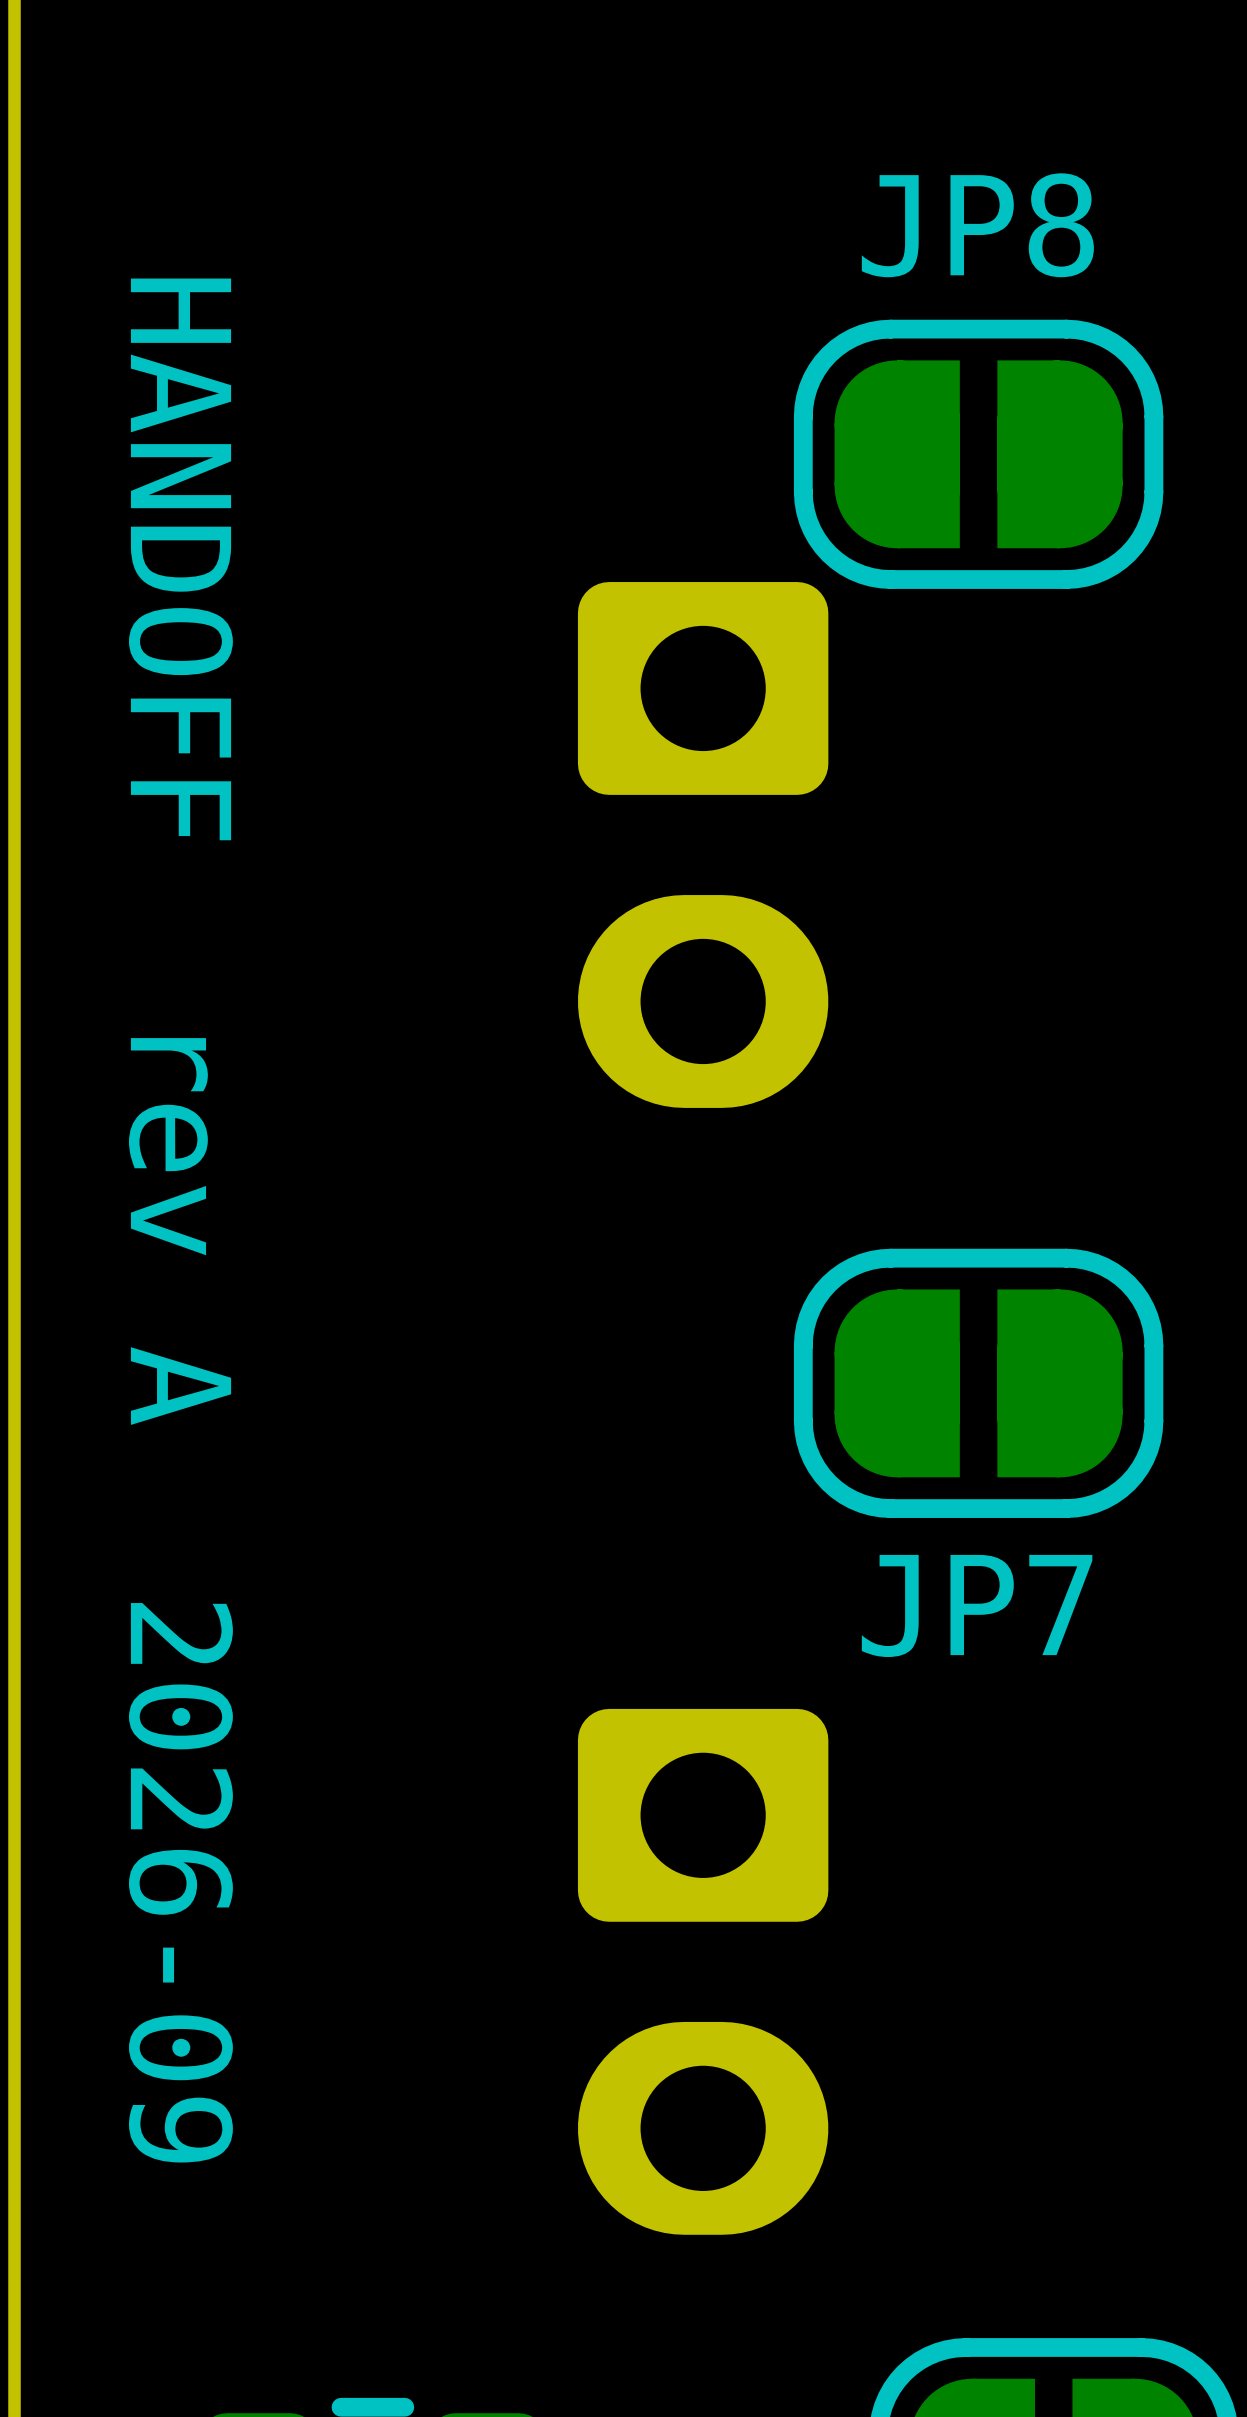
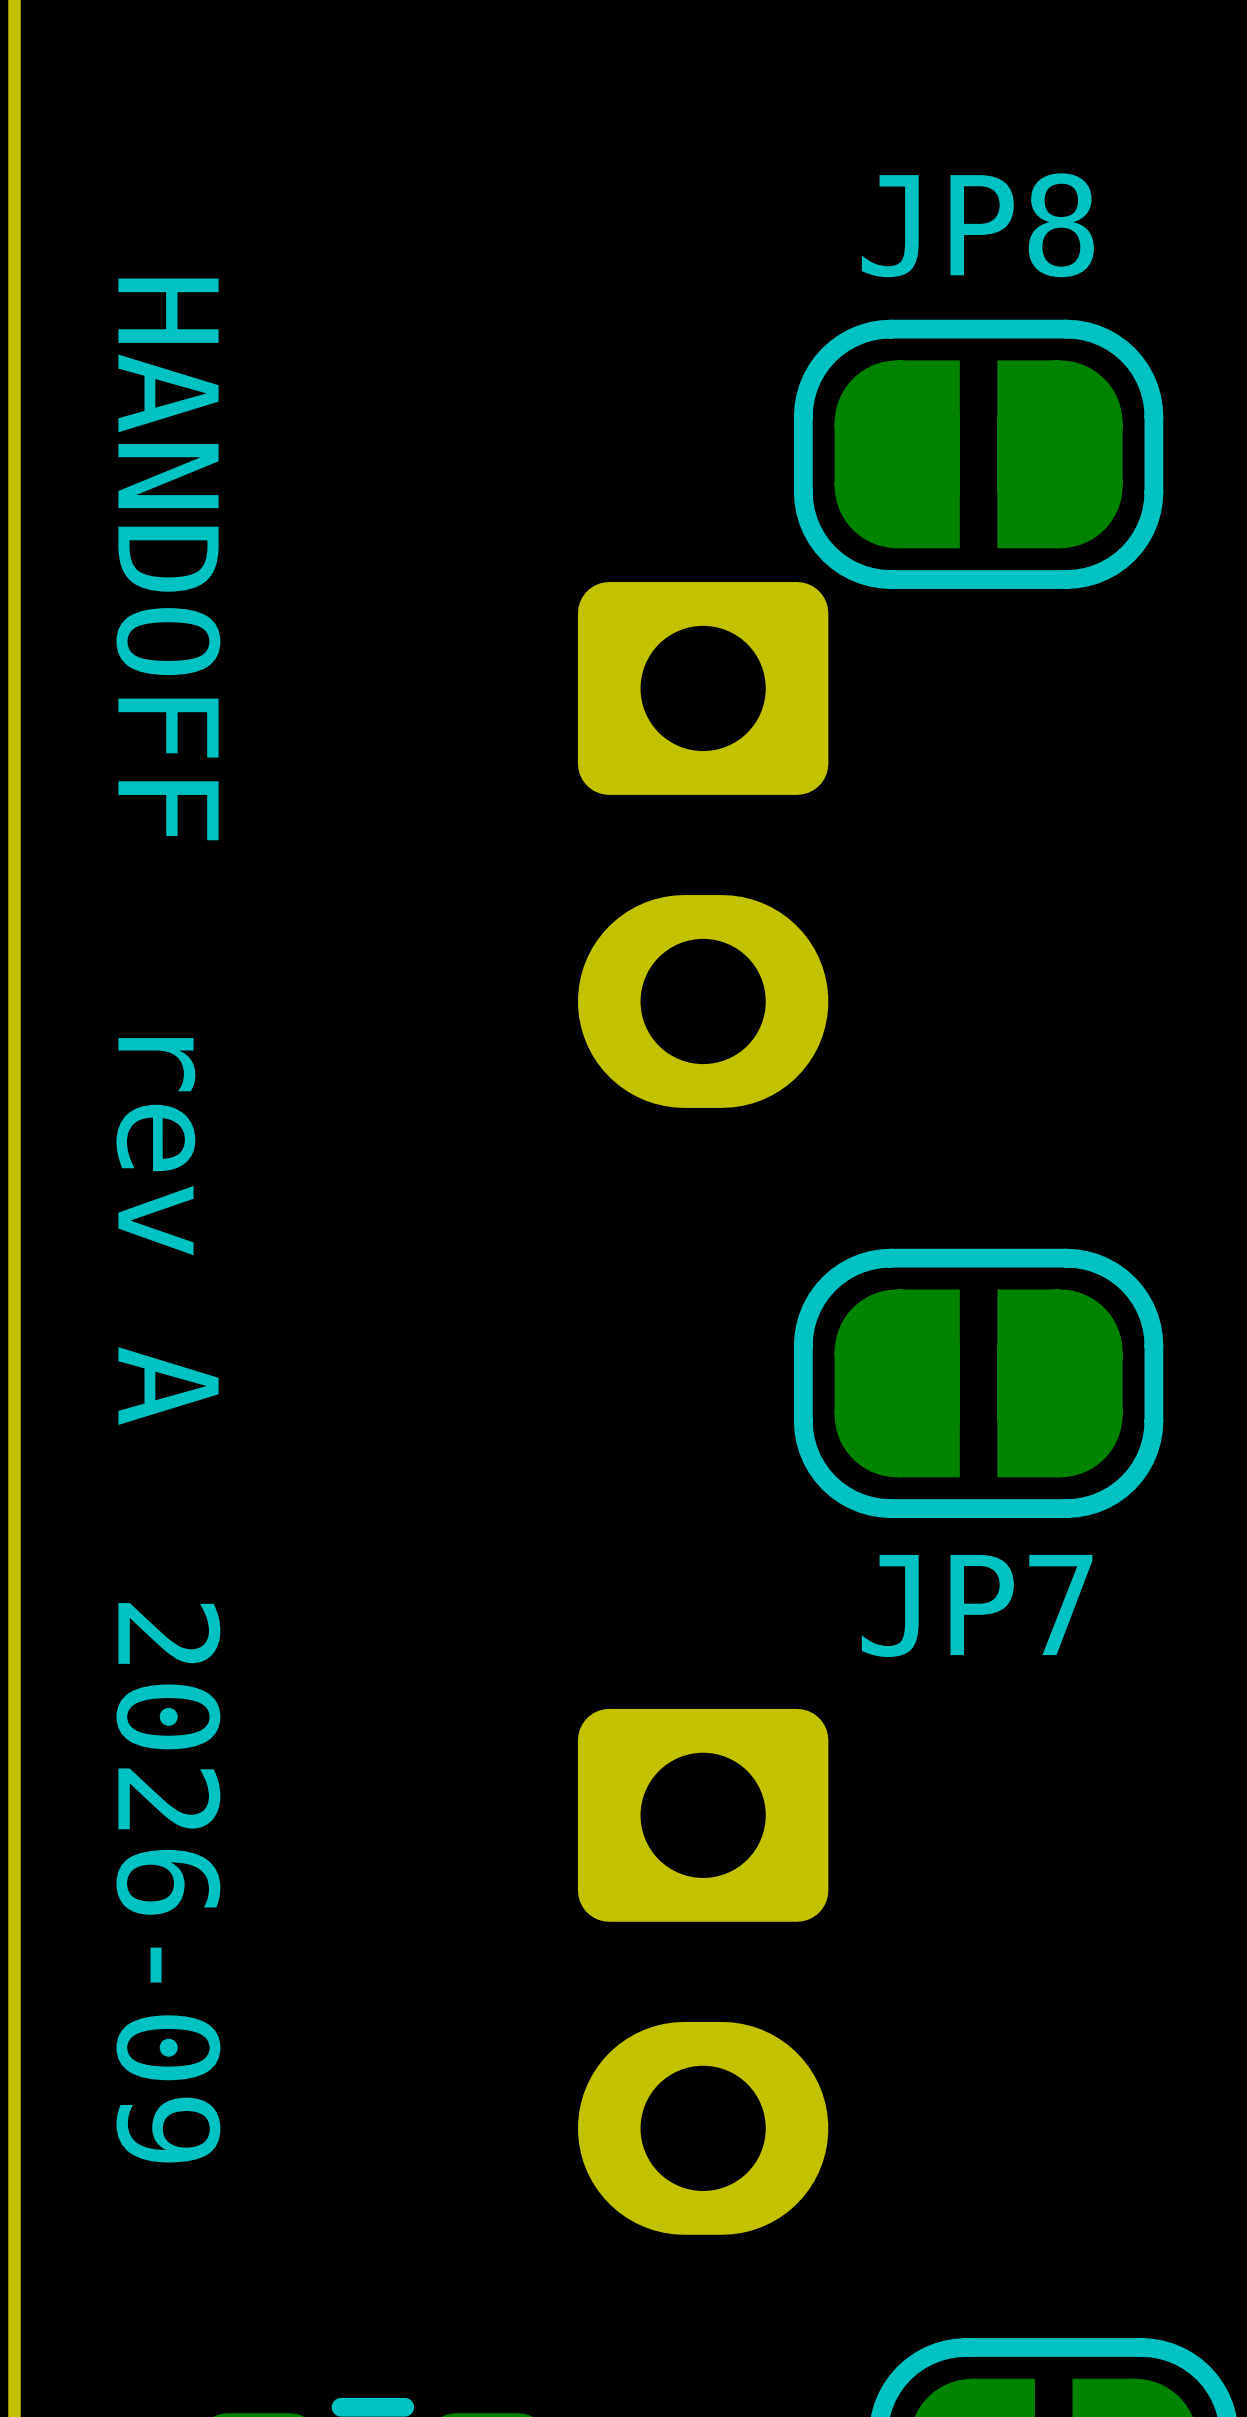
text position: HANDOFF rev A 2026-09 (180, 1220) -> HANDOFF rev A 2026-09 (168, 1220)

